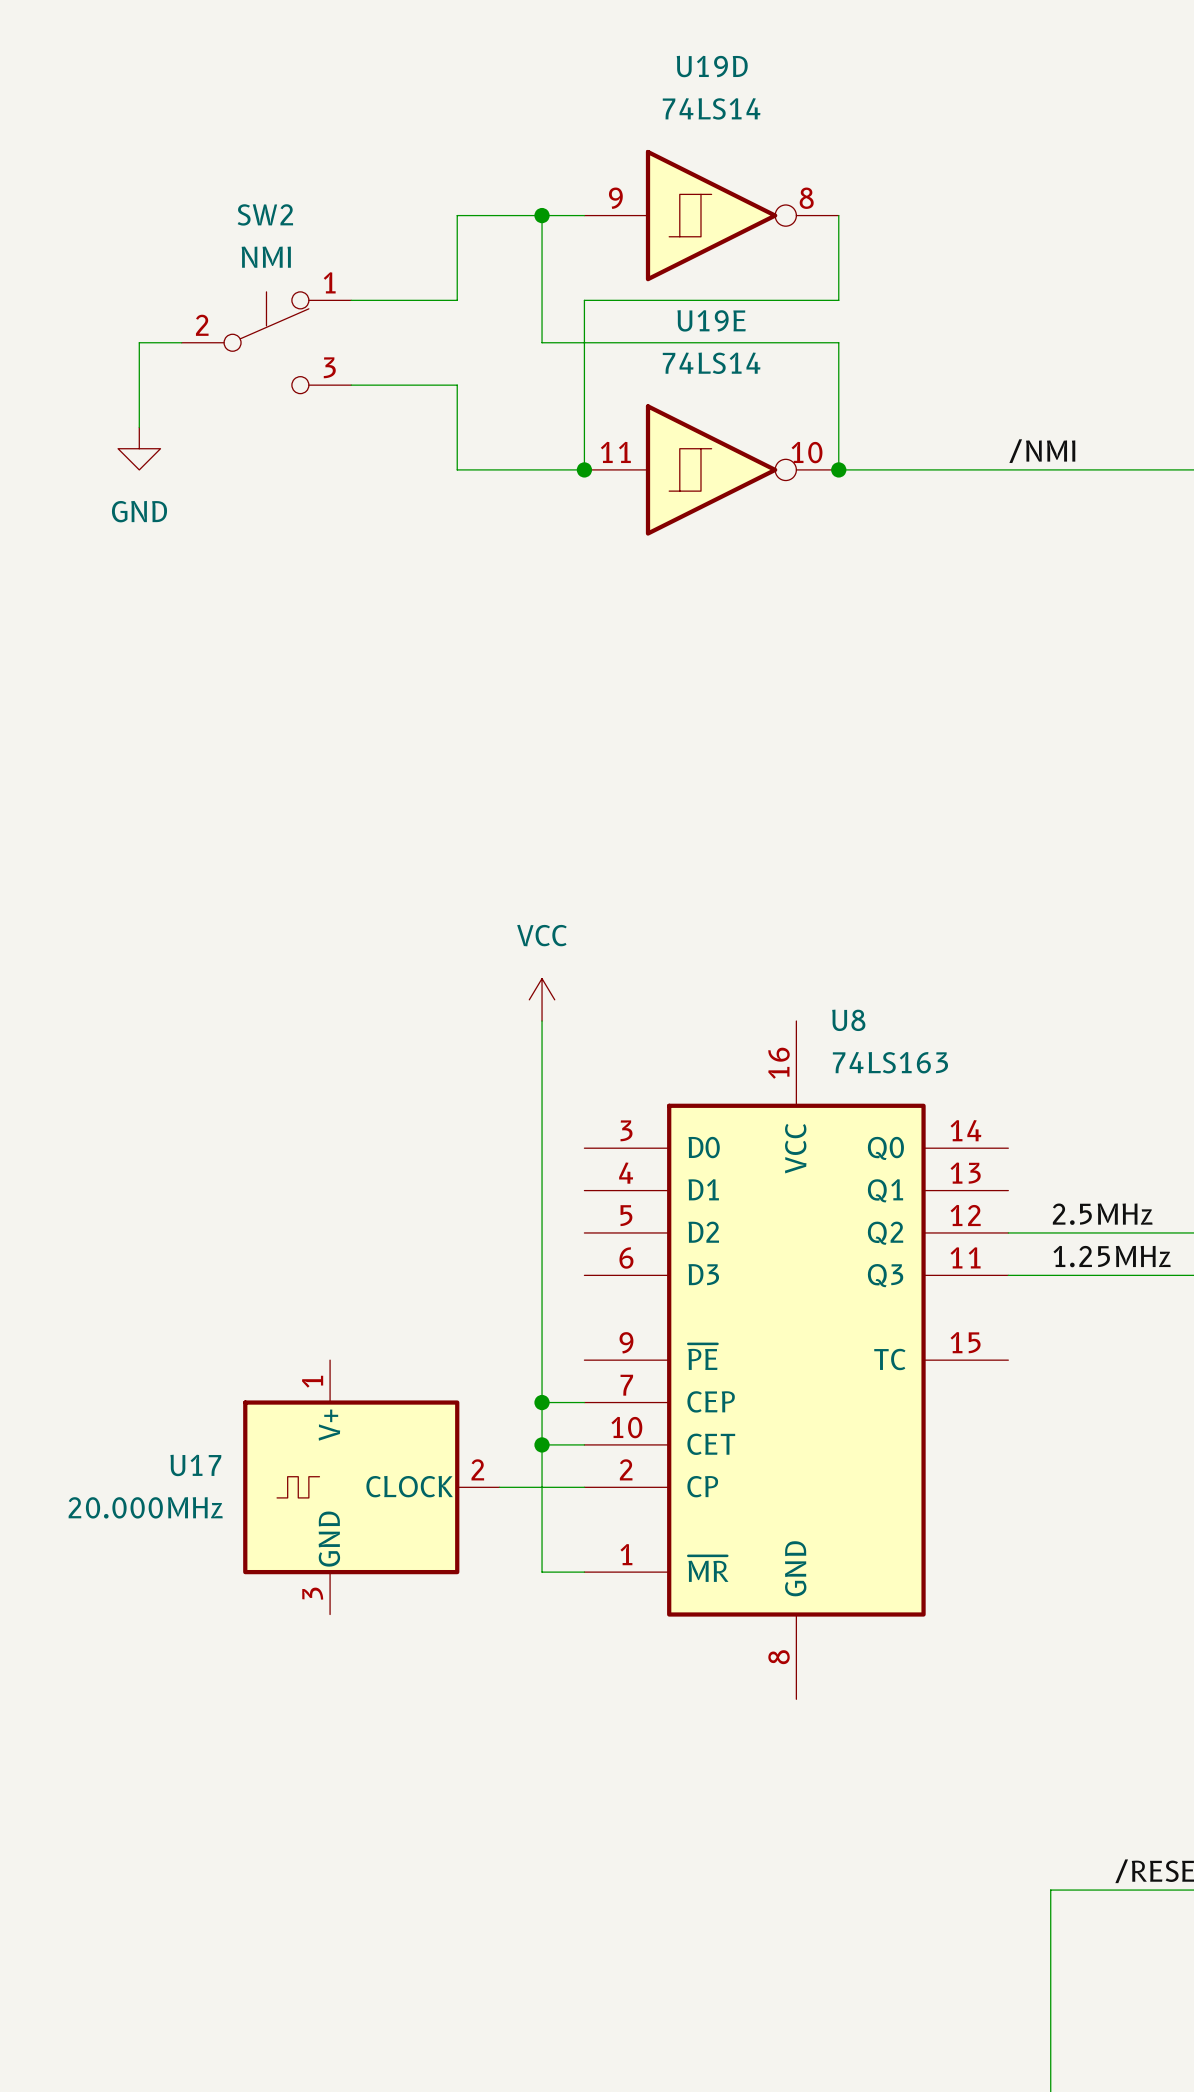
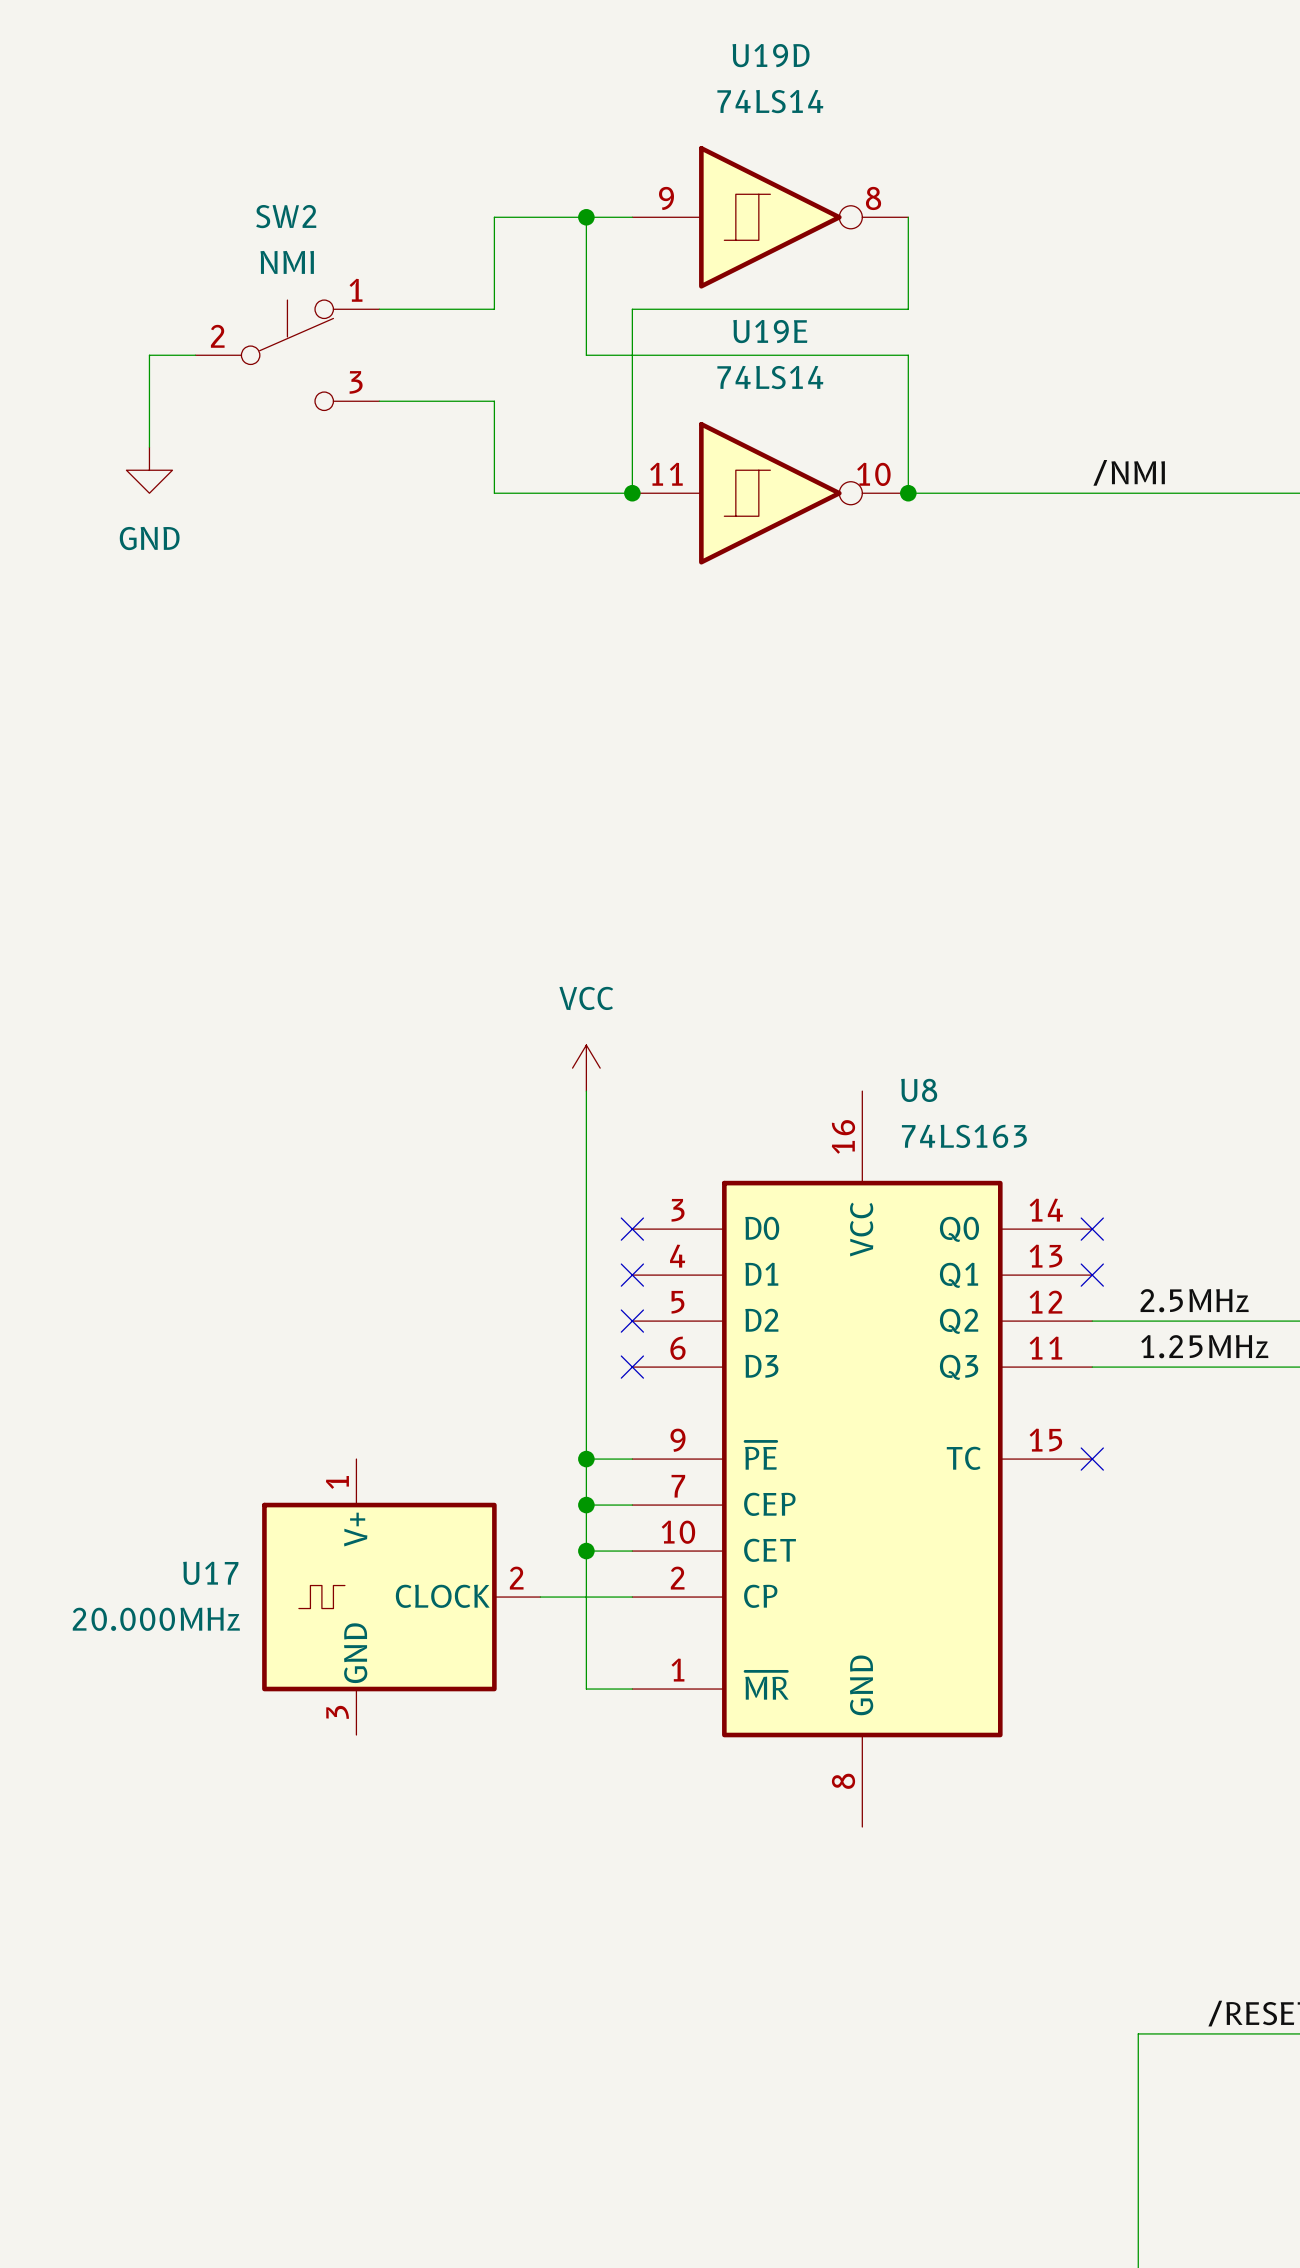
no-connect mark: none -> (632, 1229)
no-connect mark: none -> (1092, 1229)
no-connect mark: none -> (632, 1275)
no-connect mark: none -> (1092, 1275)
no-connect mark: none -> (632, 1321)
no-connect mark: none -> (632, 1367)
wire: none -> (586, 1459) (632, 1459)
junction: none -> (586, 1459)
no-connect mark: none -> (1092, 1459)

